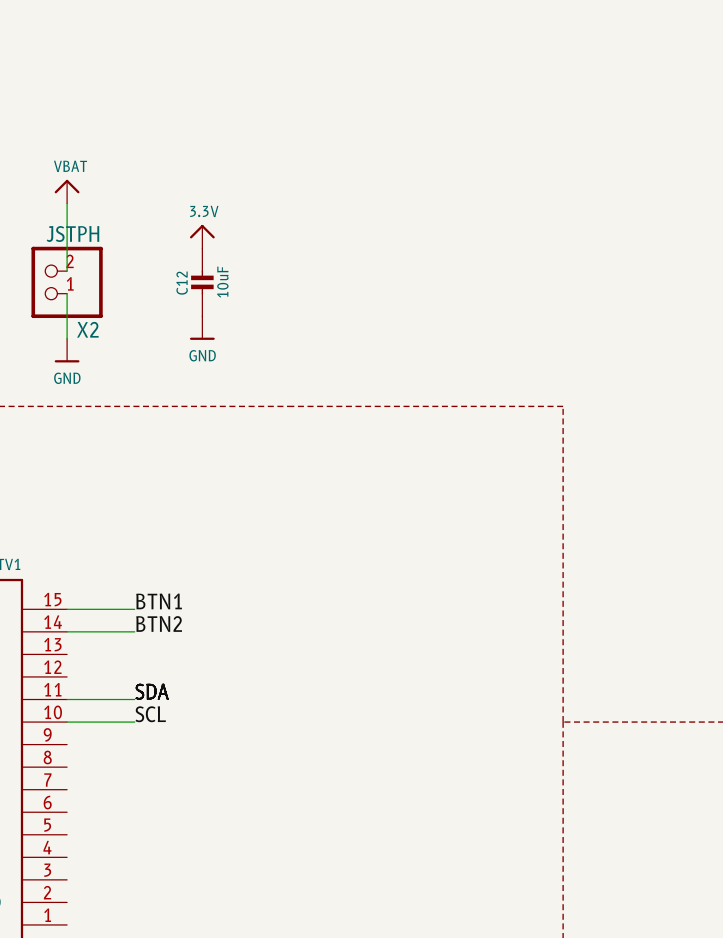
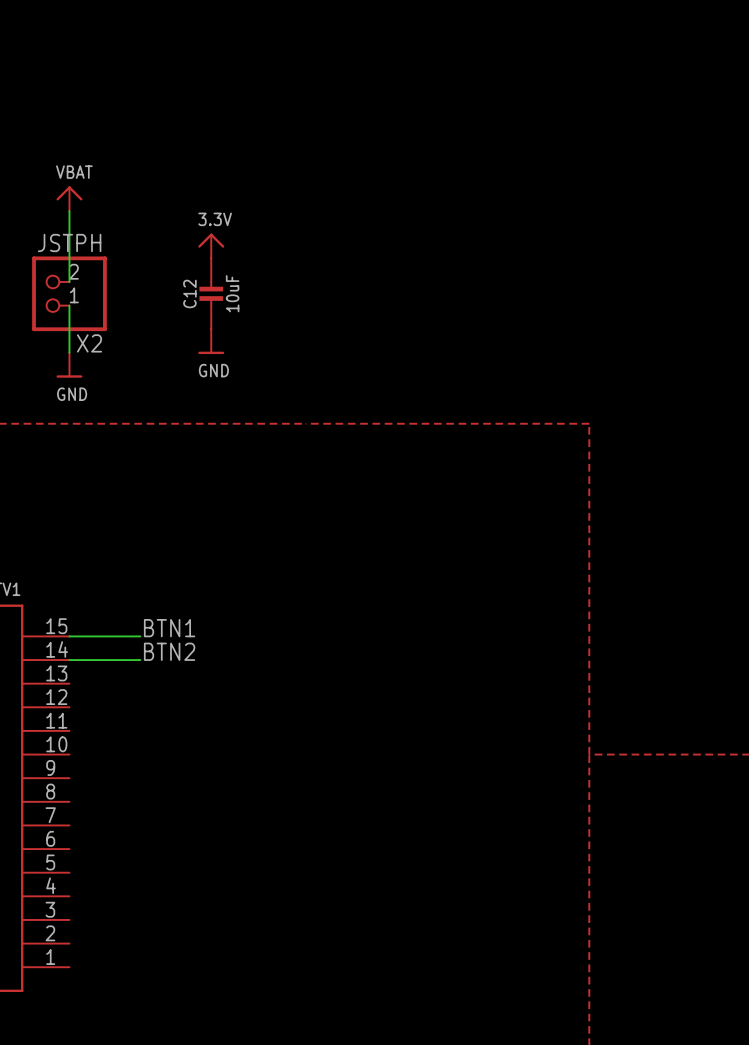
label: SDA (152, 691) -> none
wire: (67, 699) (134, 699) -> none
label: SCL (150, 714) -> none
wire: (67, 722) (134, 722) -> none

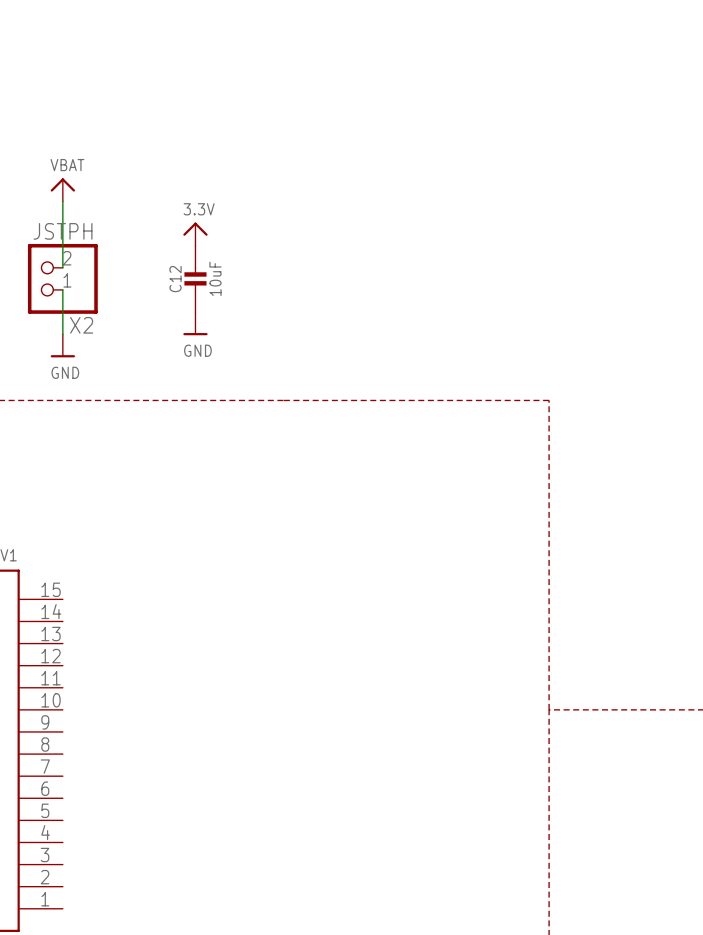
label: BTN1 (169, 628) -> none
wire: (69, 636) (140, 636) -> none
label: BTN2 (169, 651) -> none
wire: (69, 660) (140, 660) -> none

